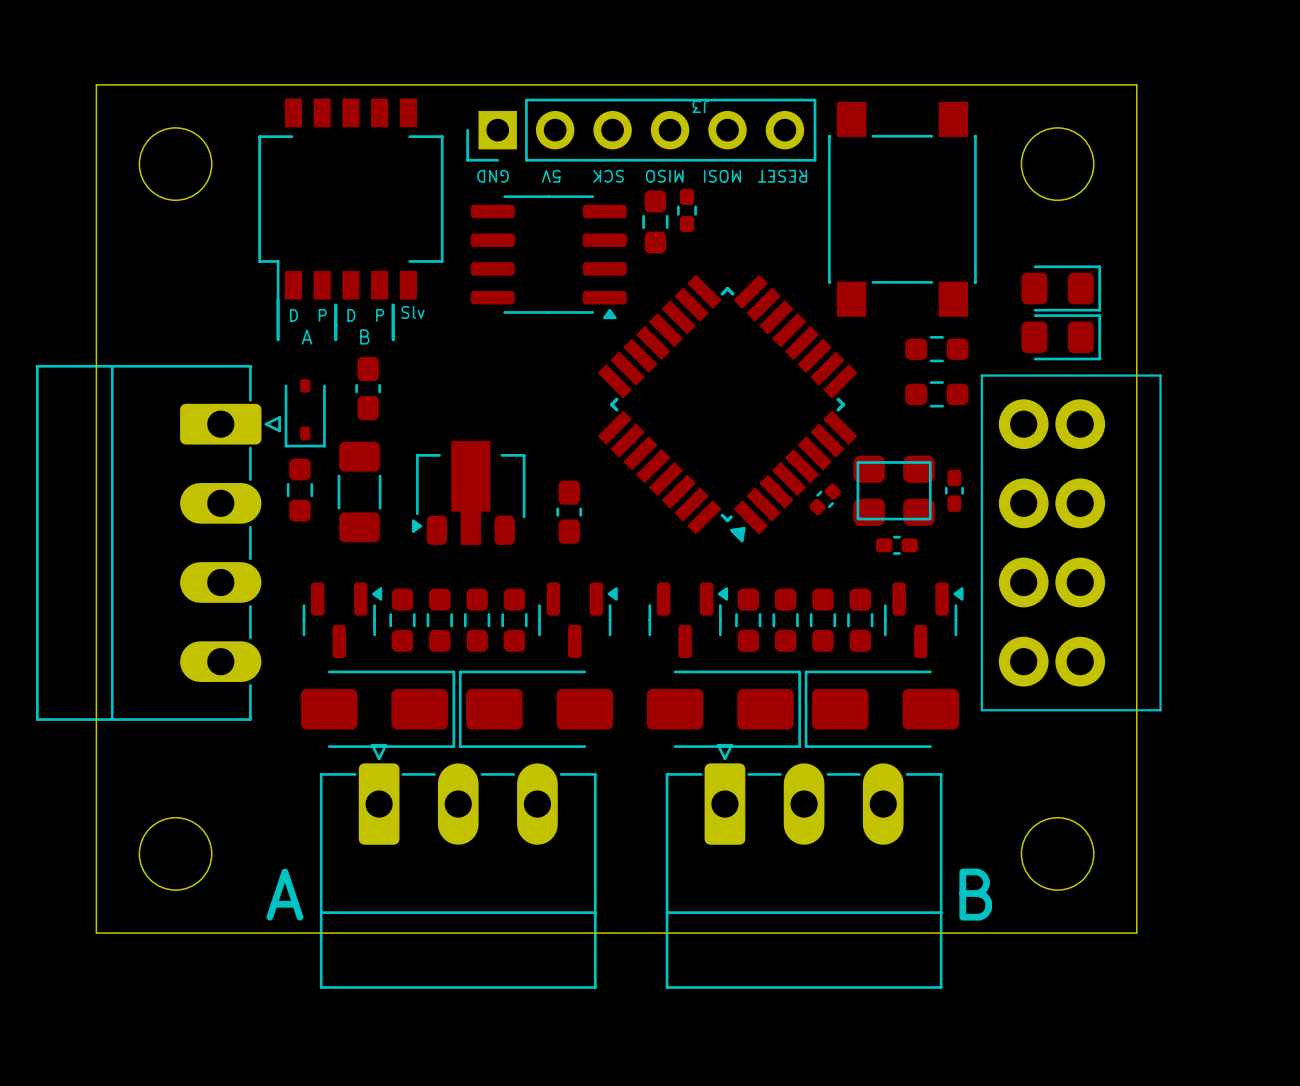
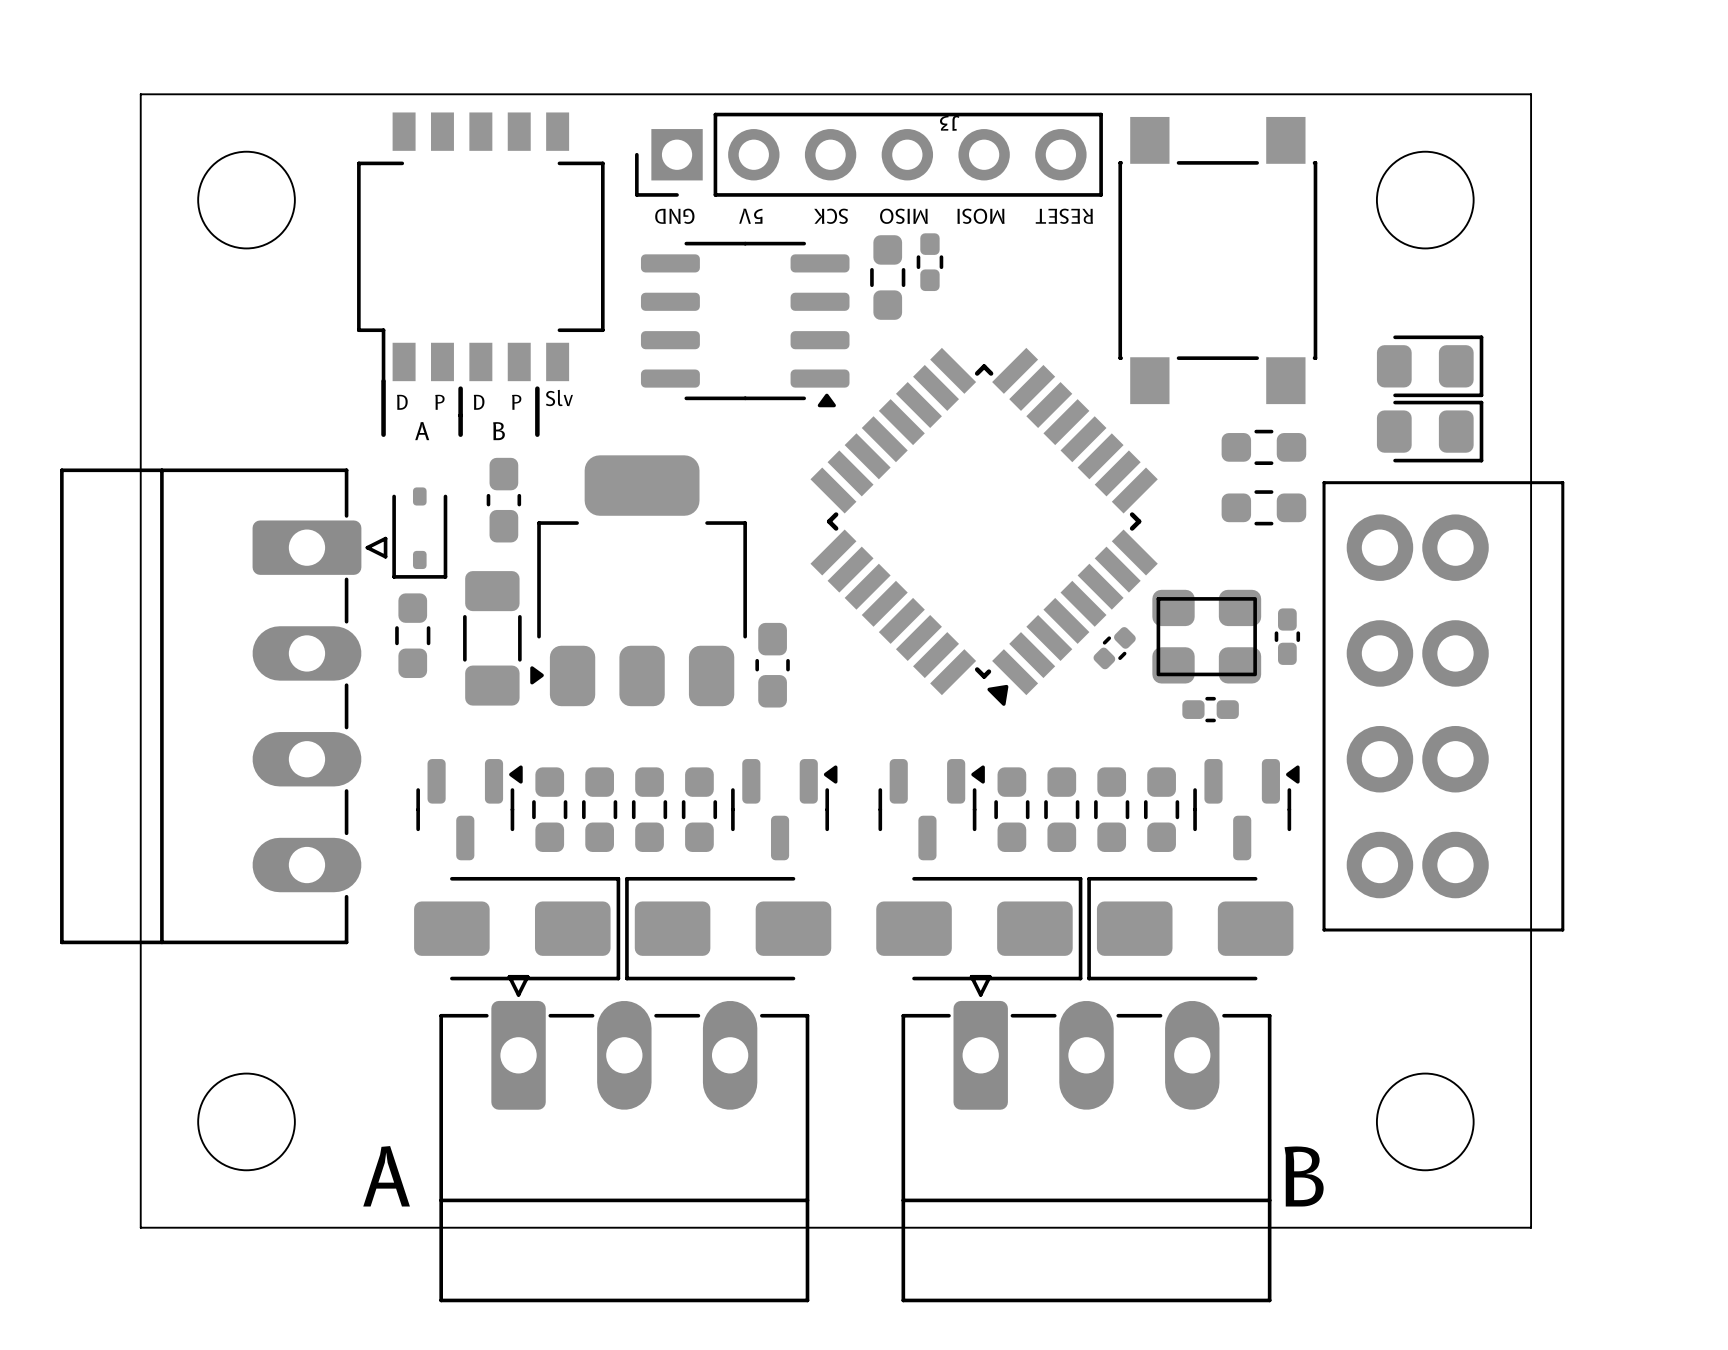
part: none -> (638, 580)
part: (468, 492) -> none

